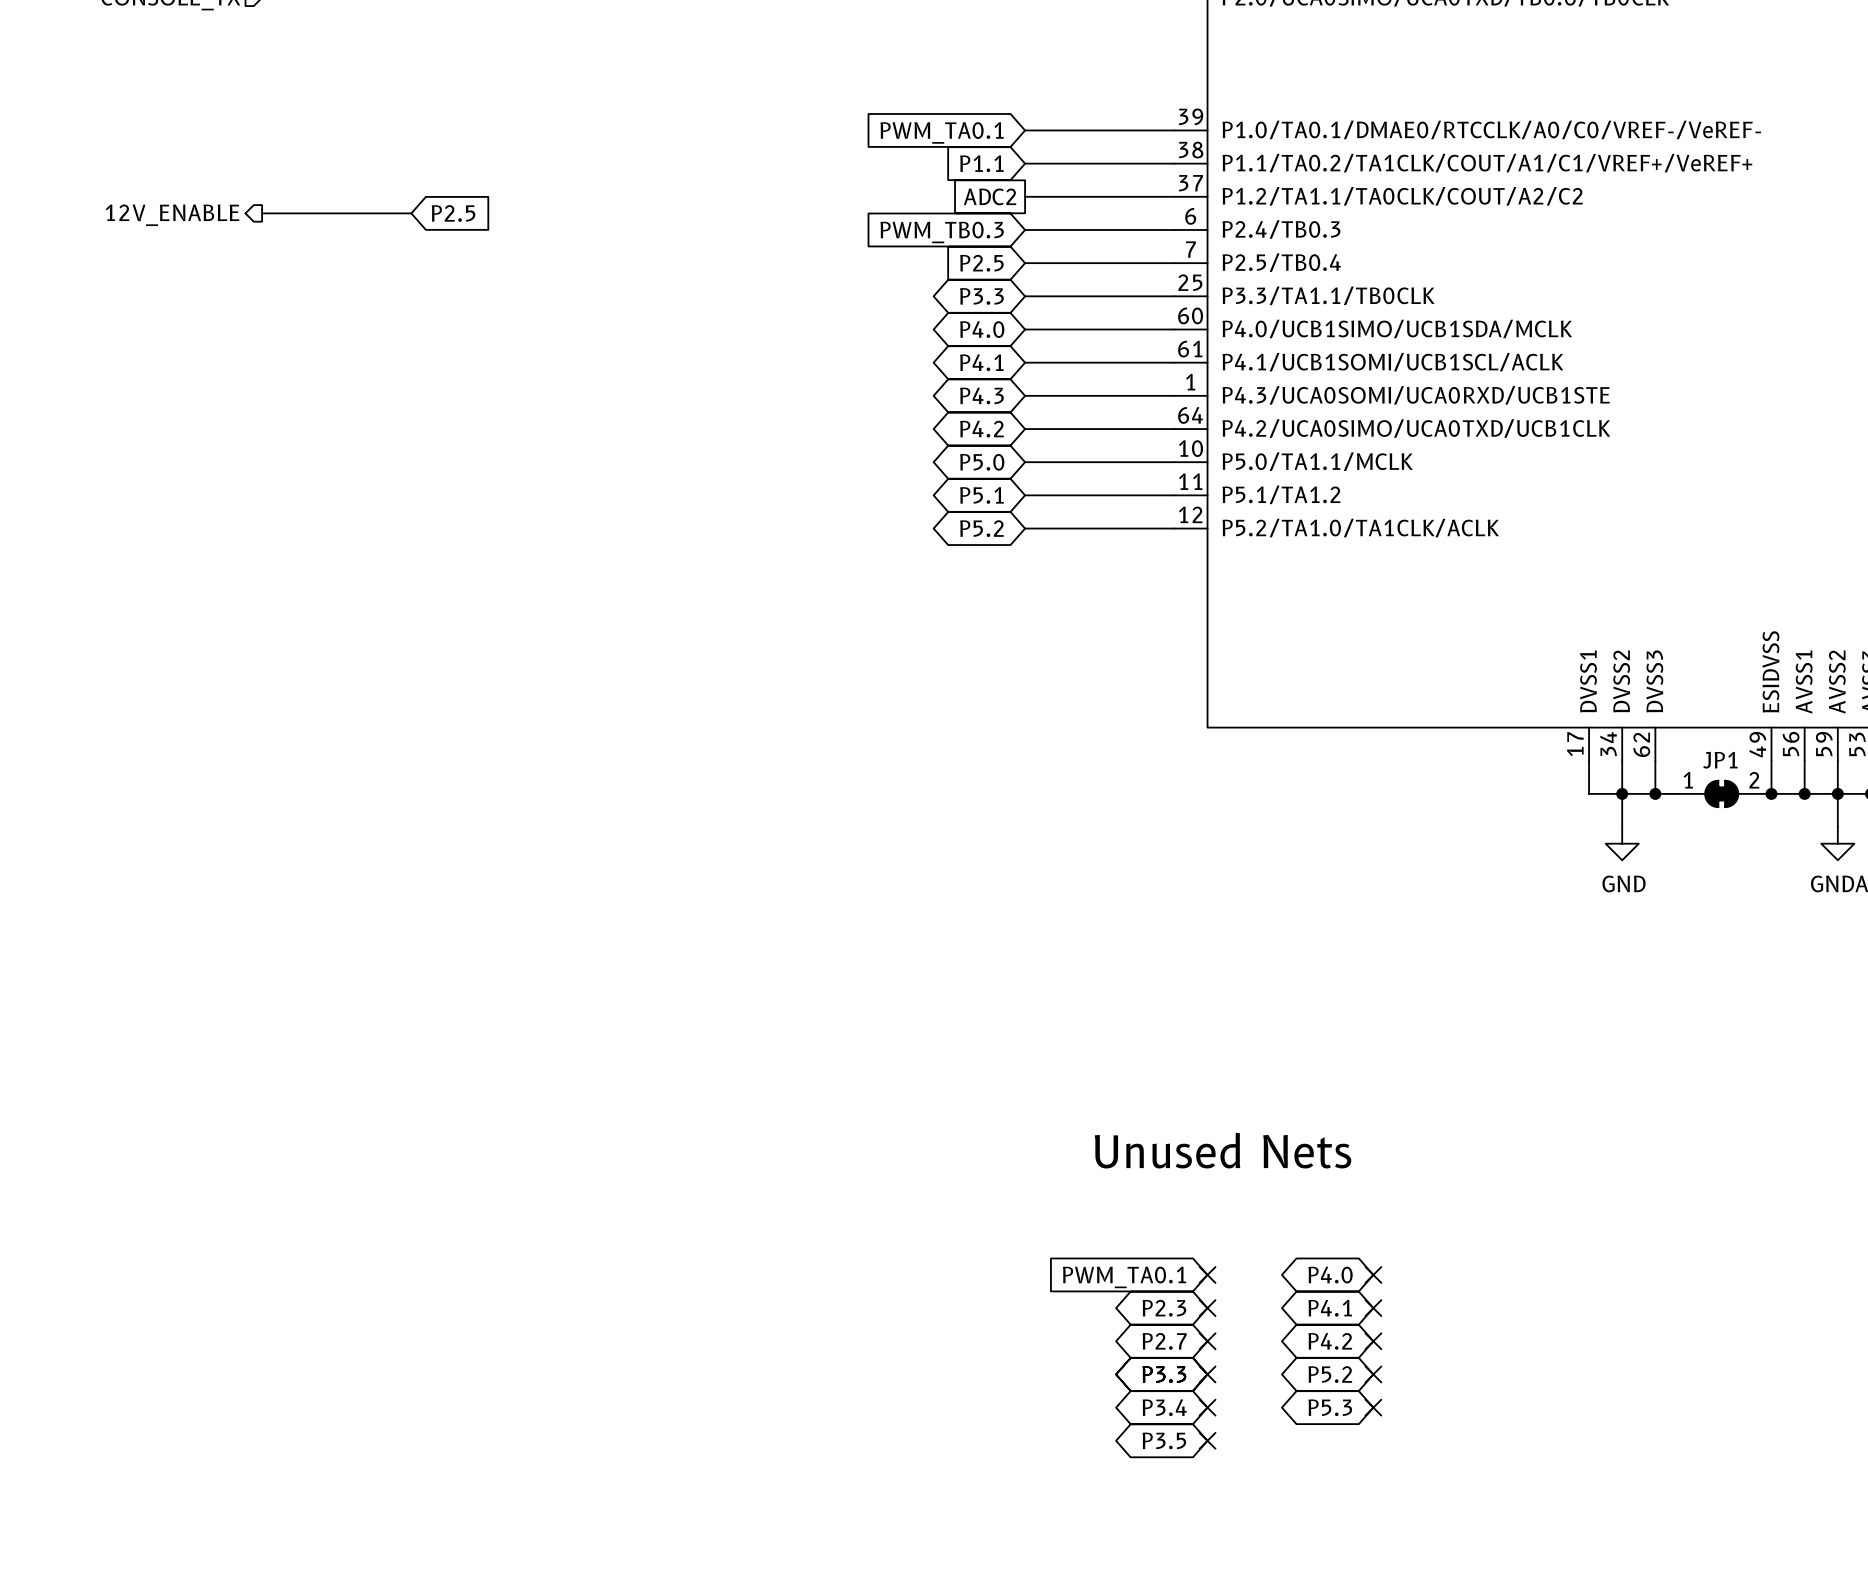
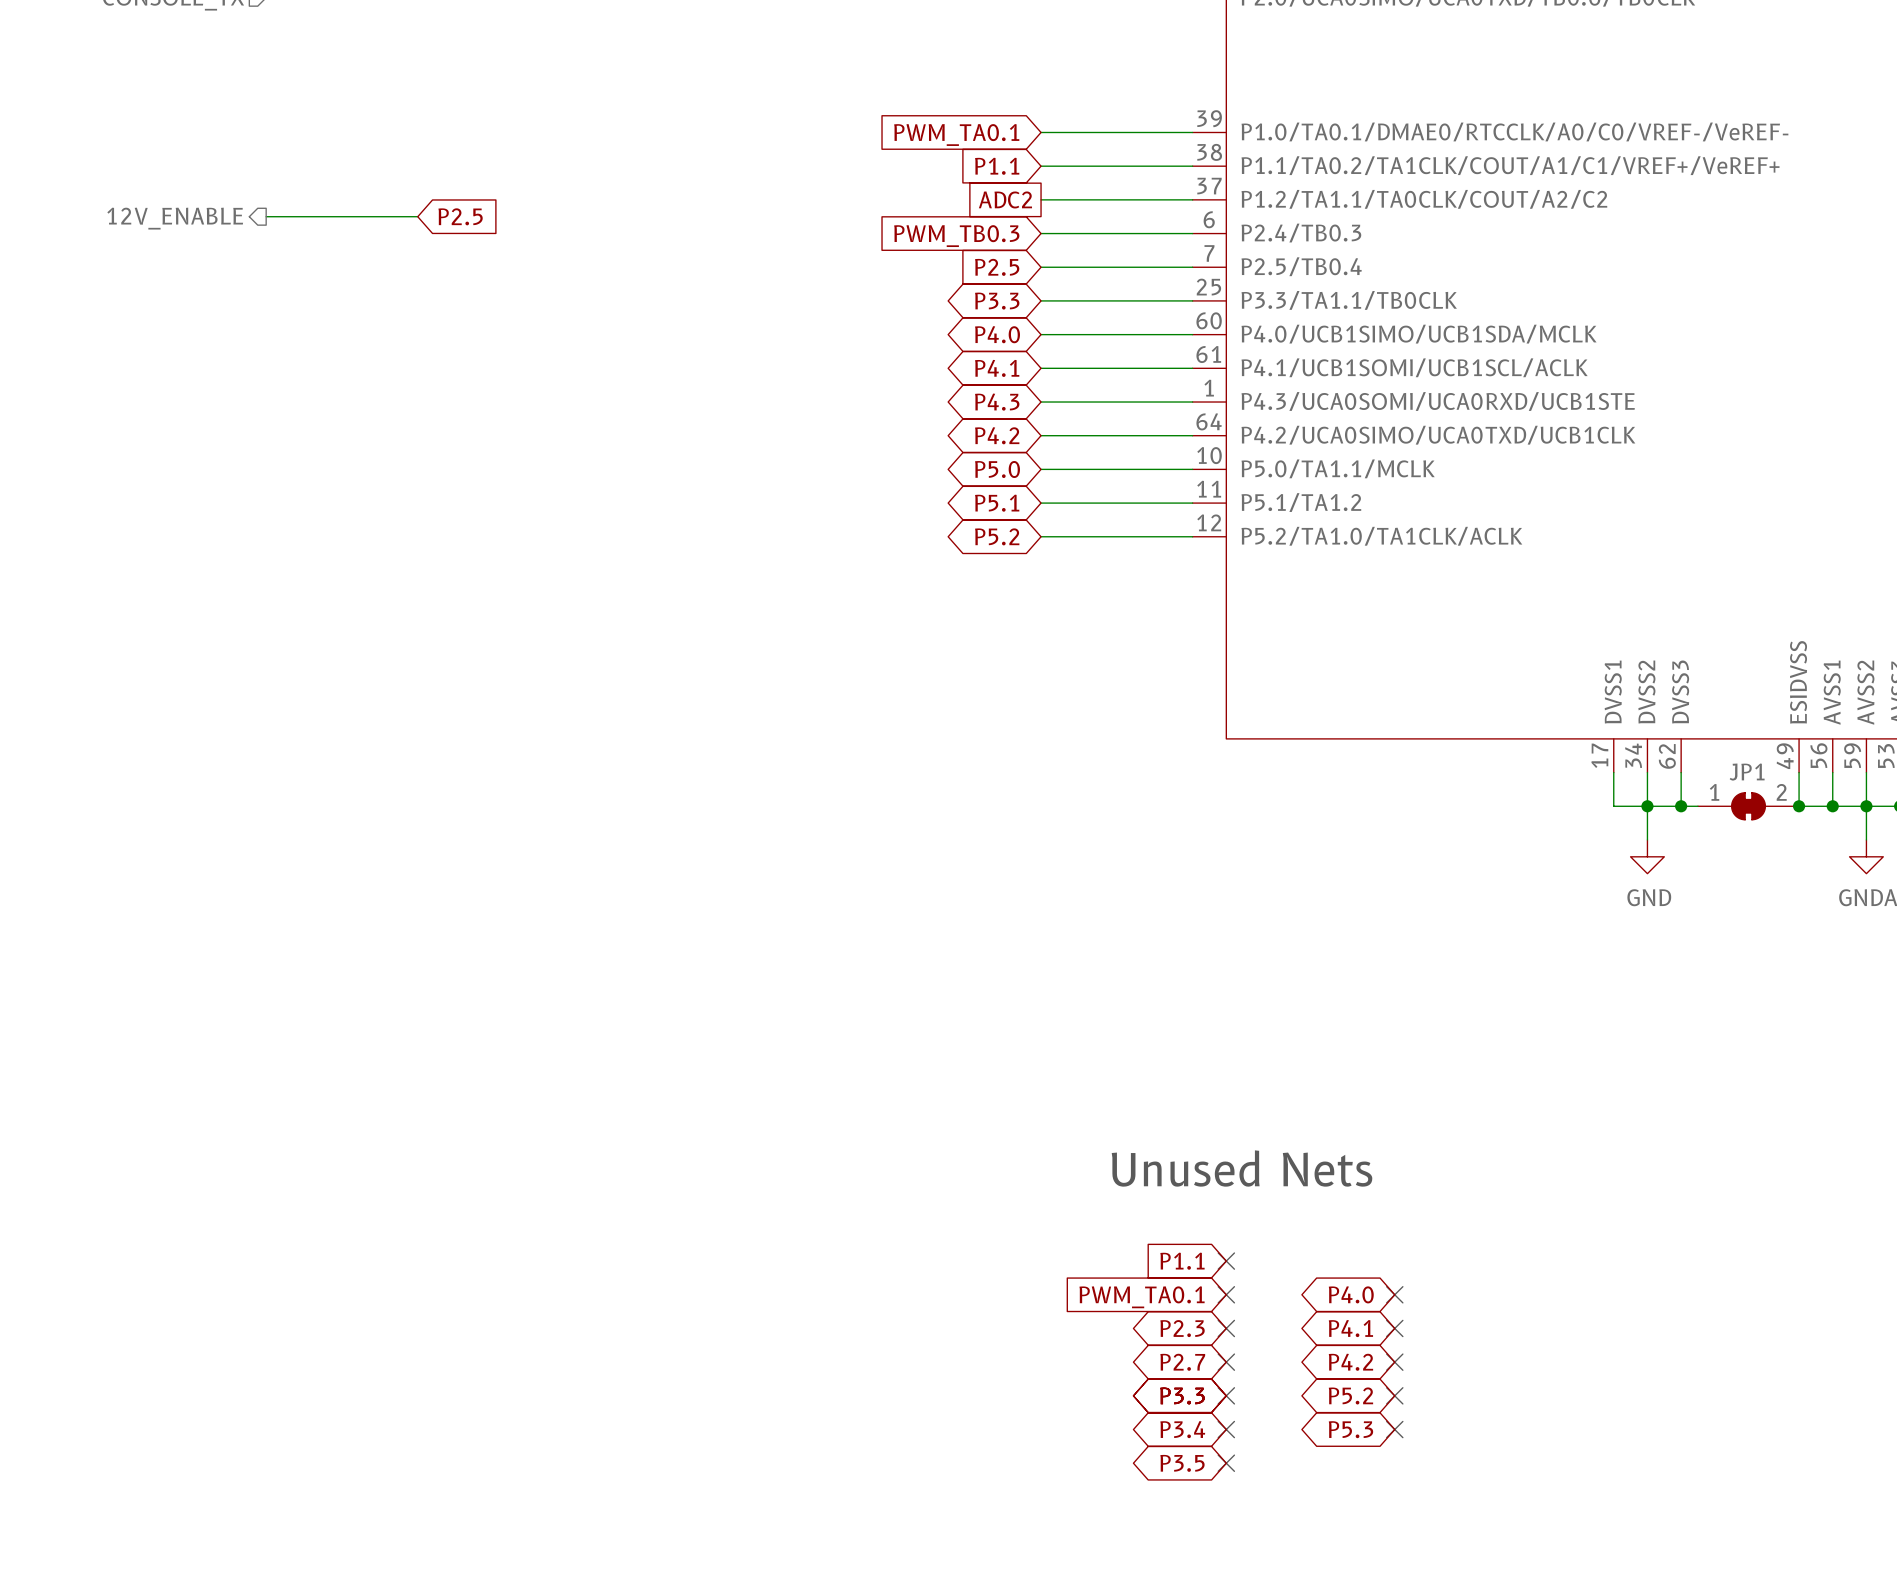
global label: none -> P1.1 (1182, 1261)
no-connect mark: none -> (1226, 1261)

